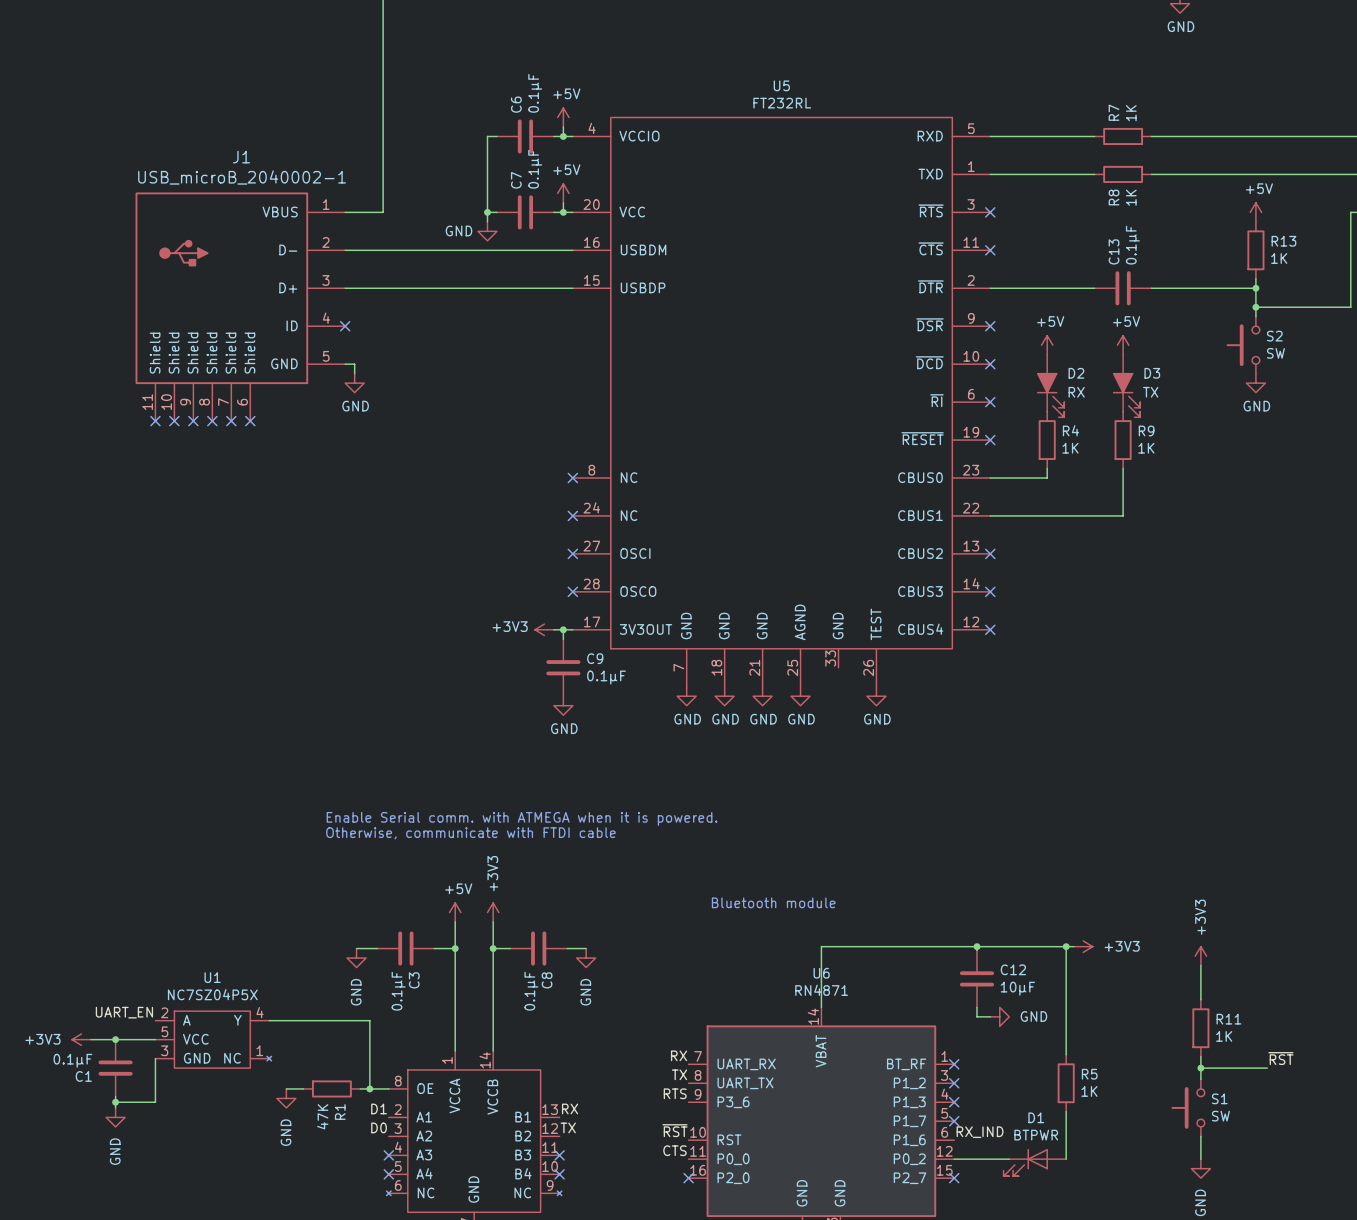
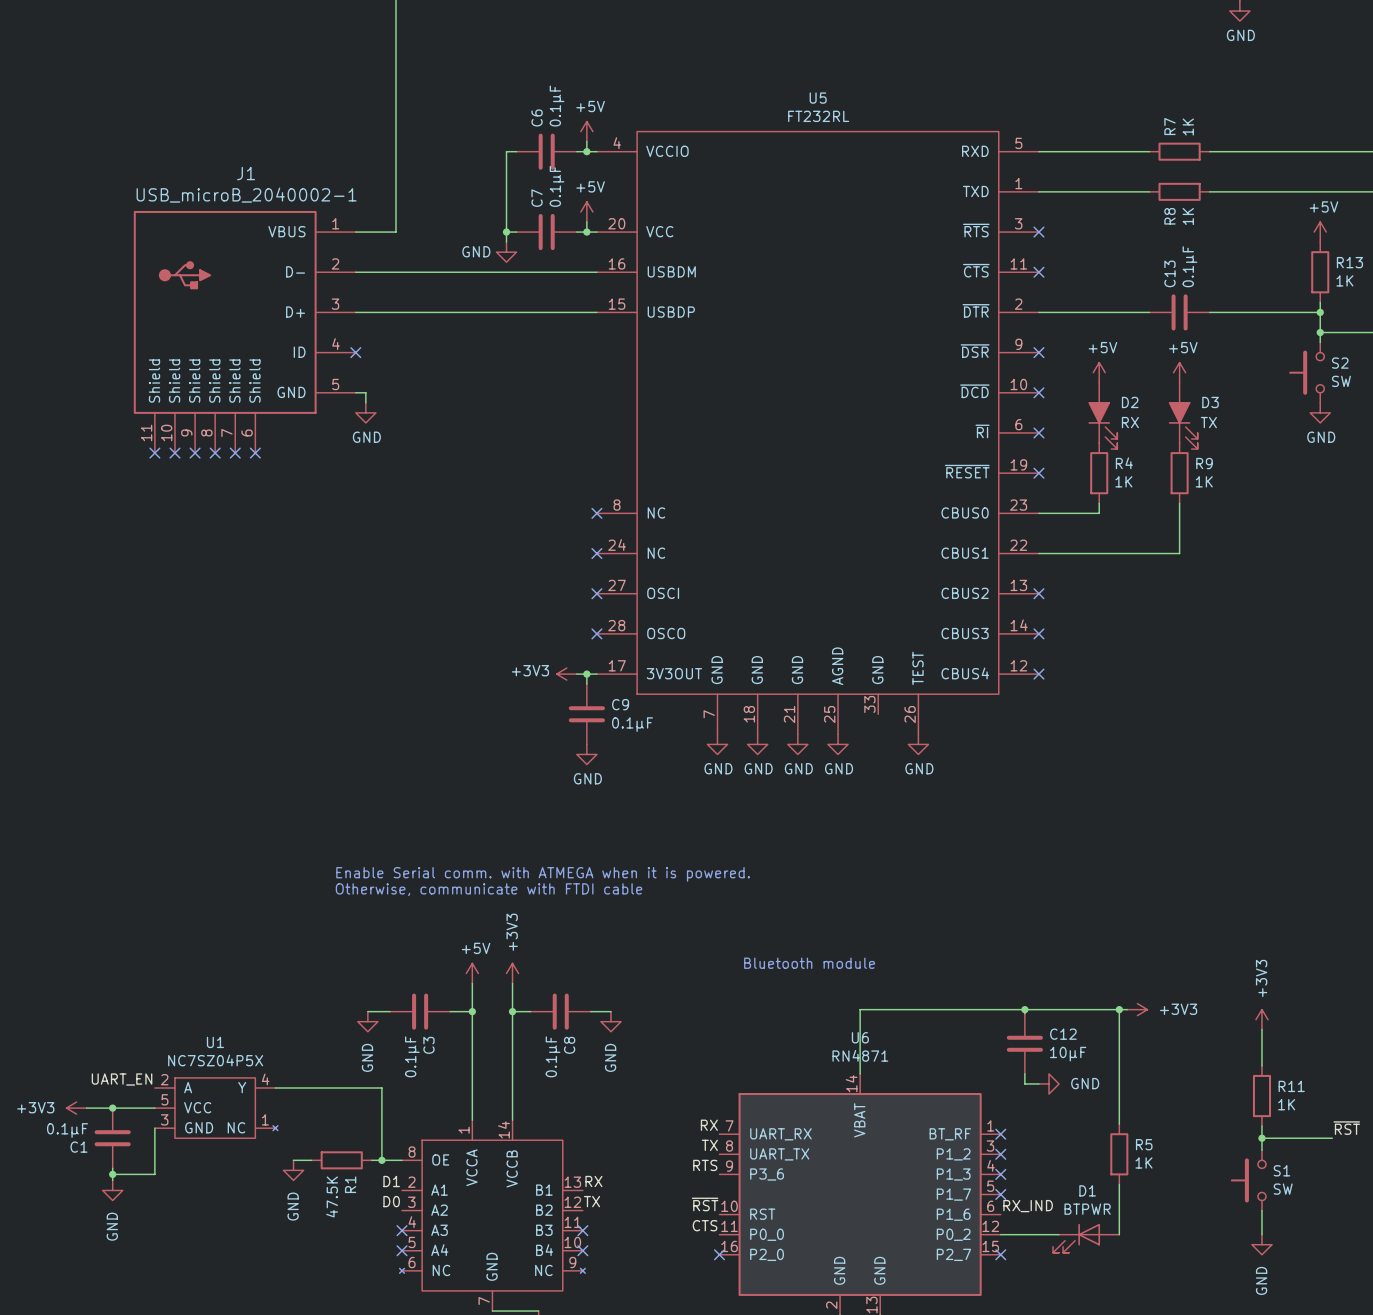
R1 value: 47K (322, 1116) -> 47.5K (332, 1196)

